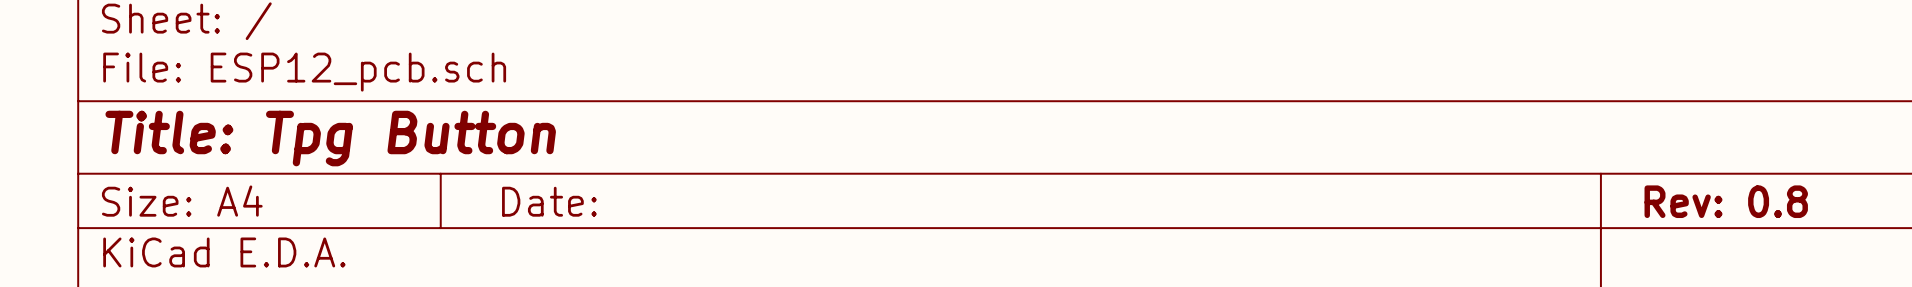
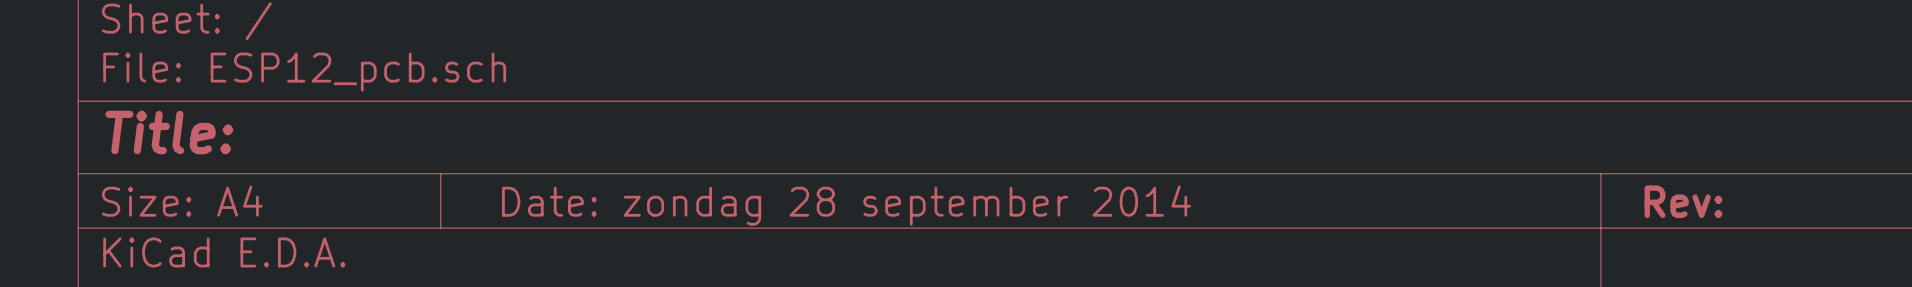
title block: Title: Tpg Button (330, 138) -> Title: (169, 132)
title block: Date: (549, 201) -> Date: zondag 28 september 2014 (846, 205)
title block: Rev: 0.8 (1726, 201) -> Rev: (1683, 201)

